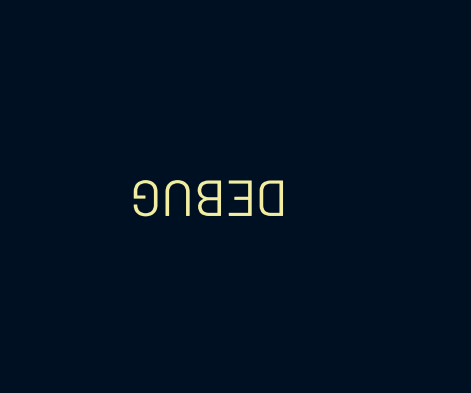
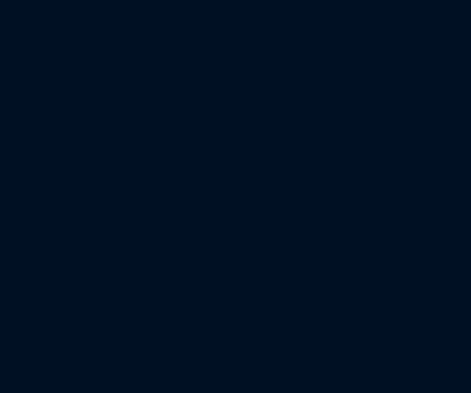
text: DEBUG (208, 198) -> none

